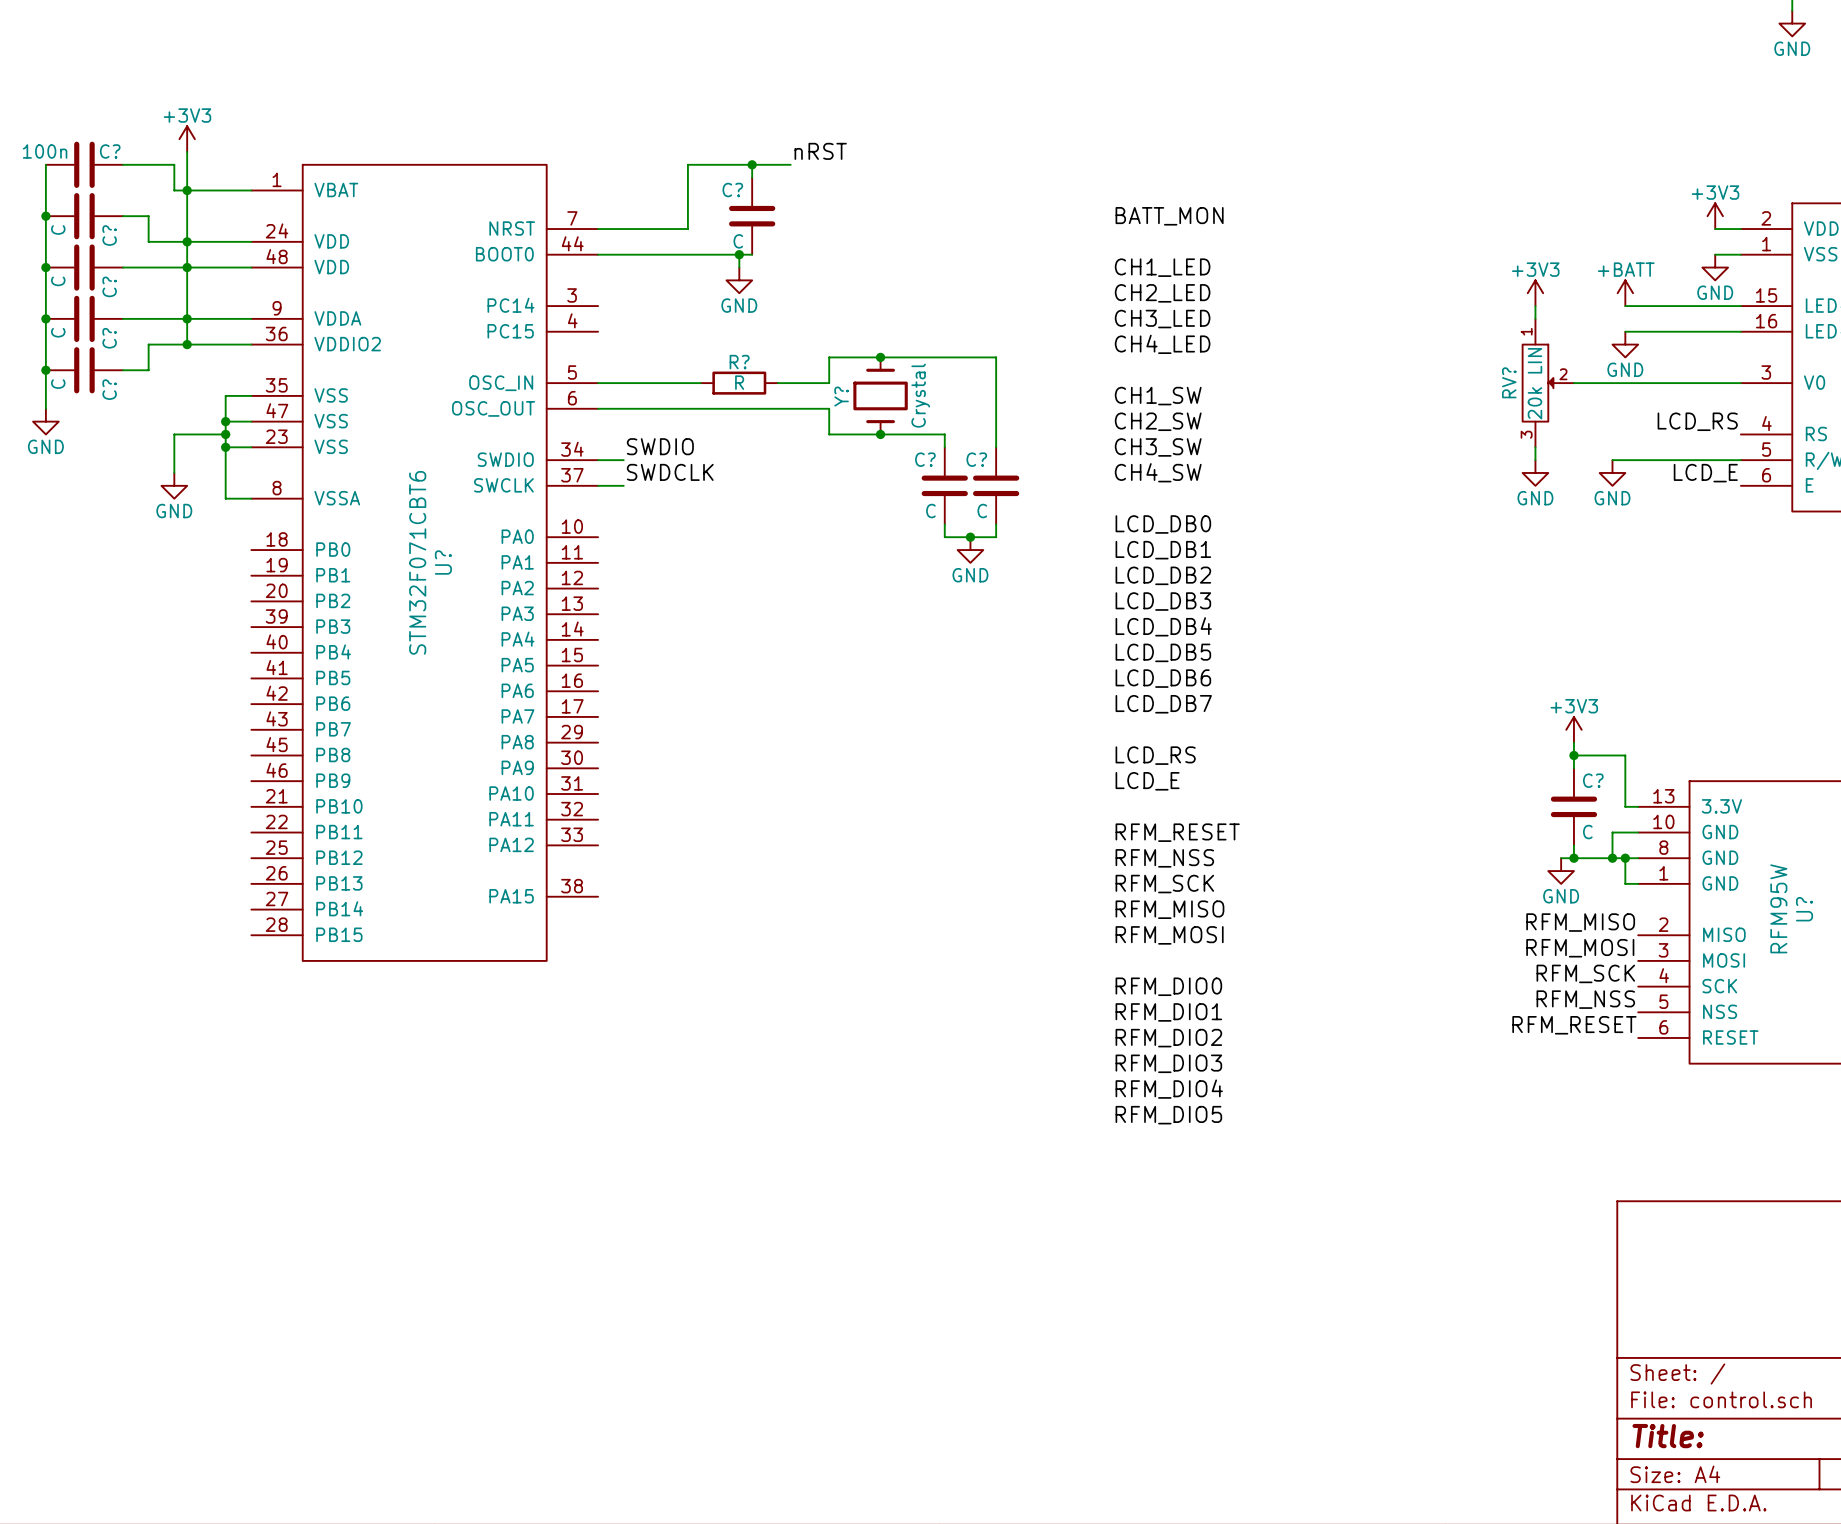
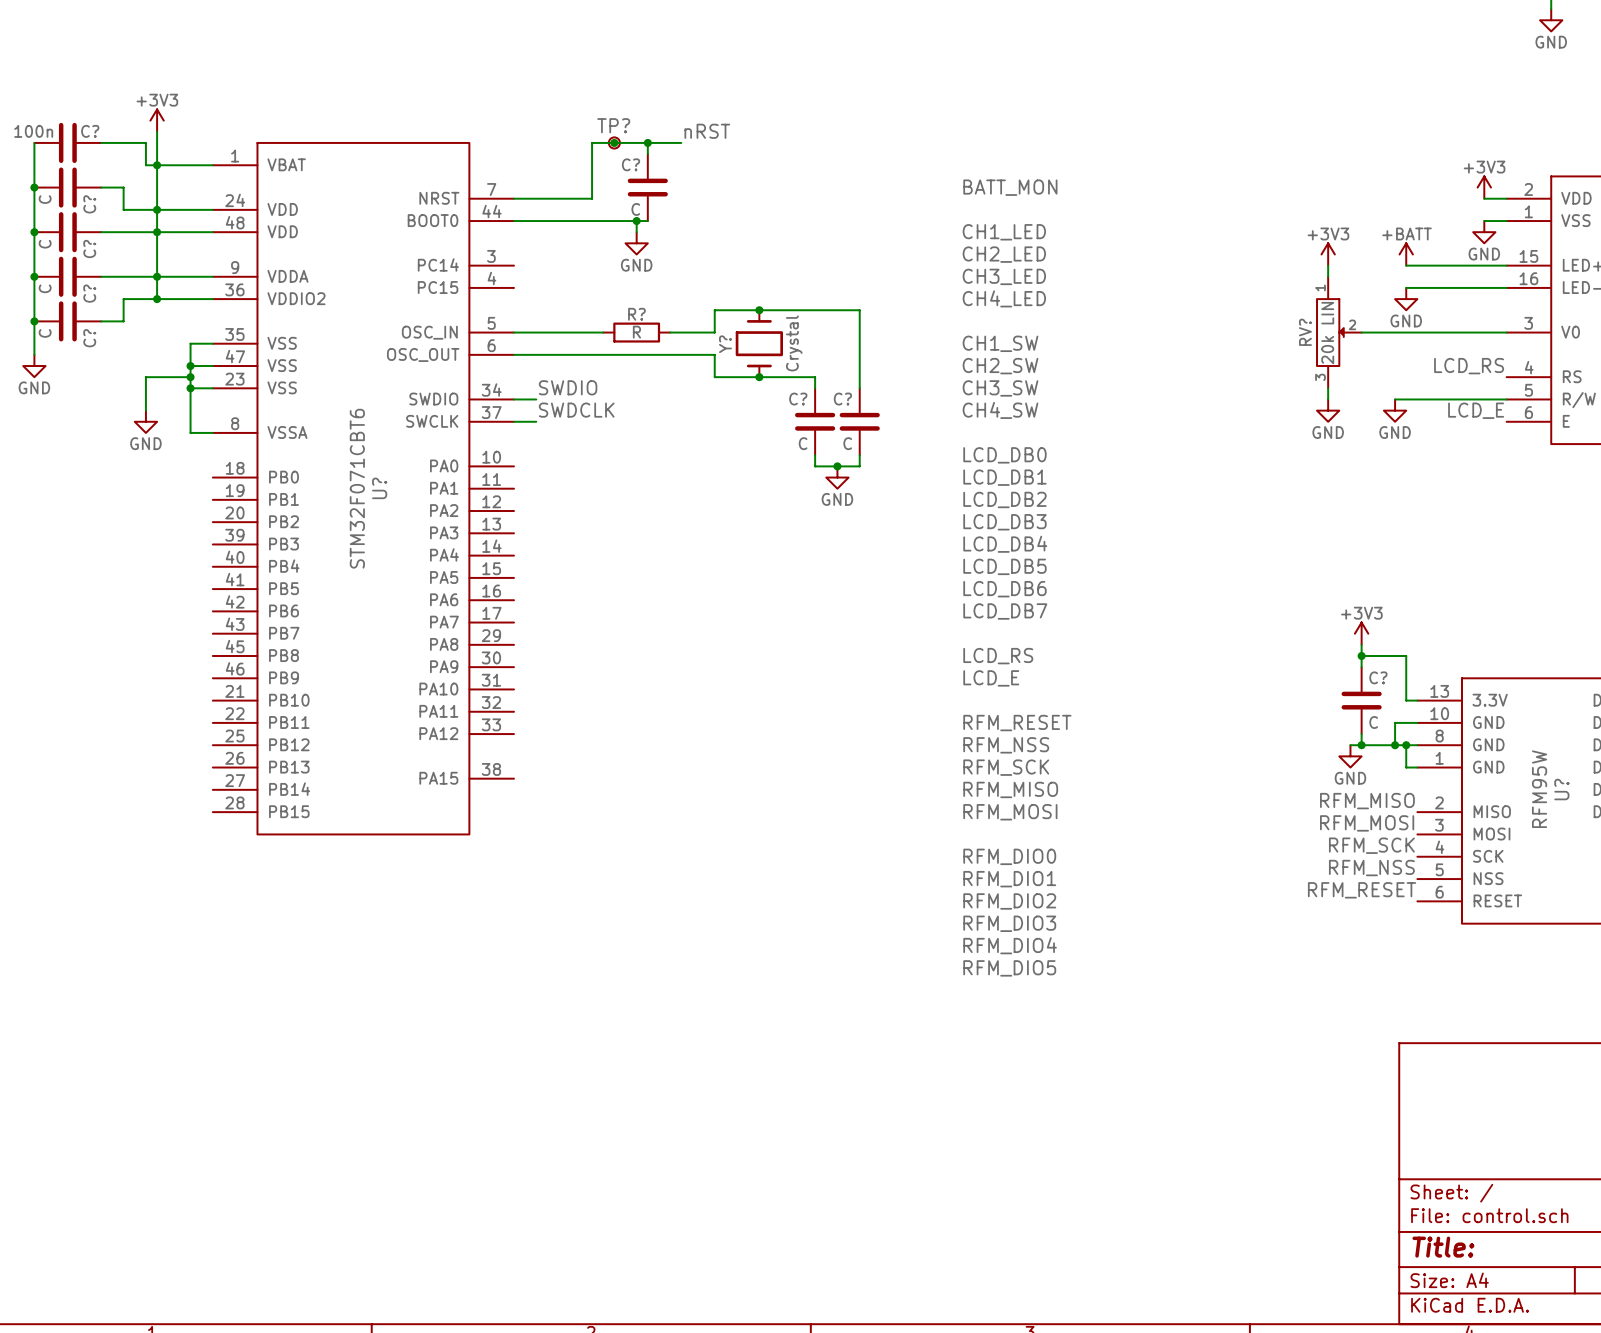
TP?: none -> (614, 142)
junction: none -> (614, 142)

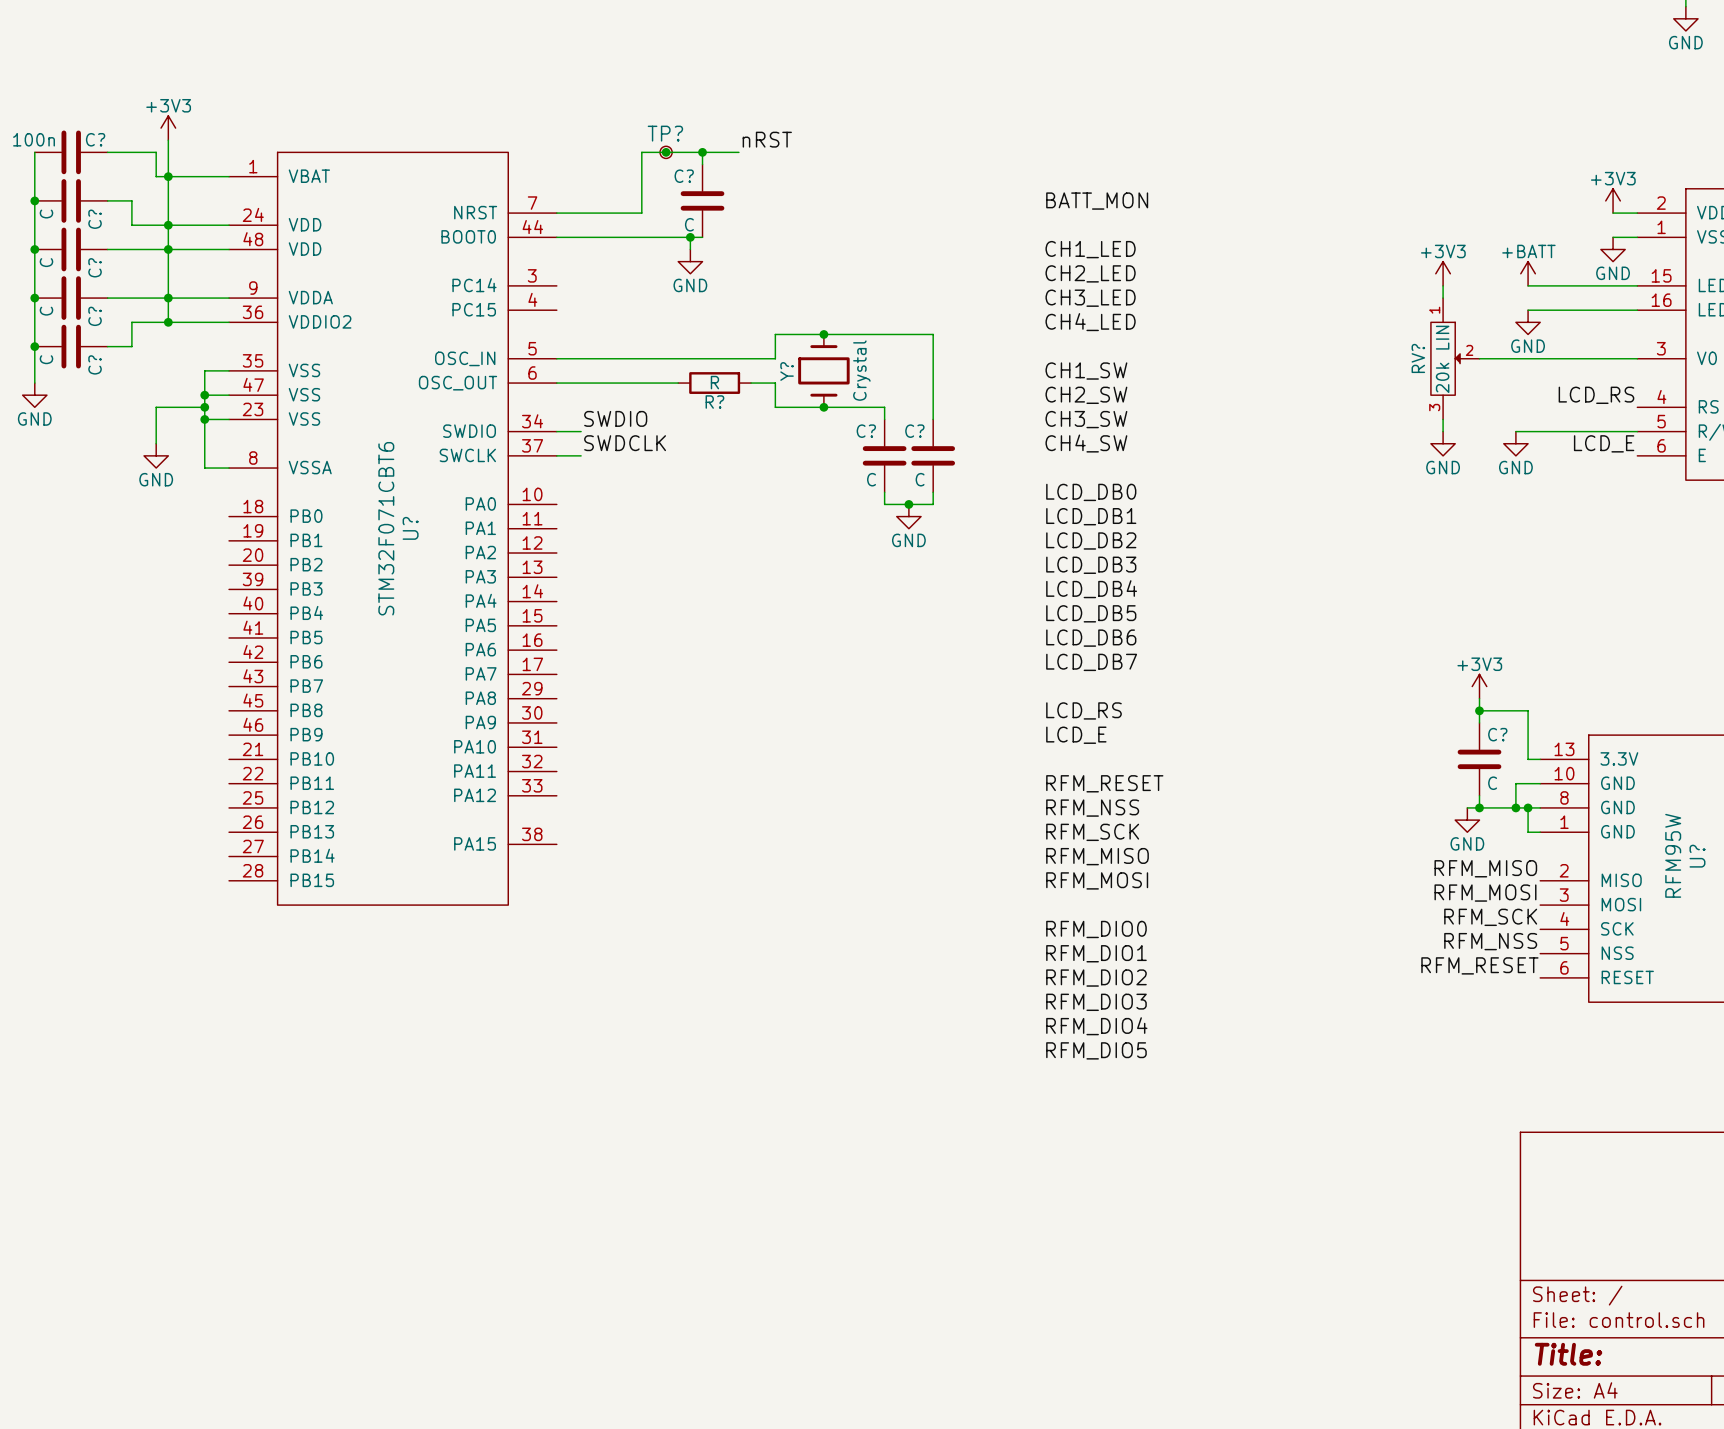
R? name position: R? (636, 314) -> R? (714, 402)
R? position: (636, 332) -> (714, 383)
wire: (625, 354) (692, 354) -> (653, 358) (726, 358)

